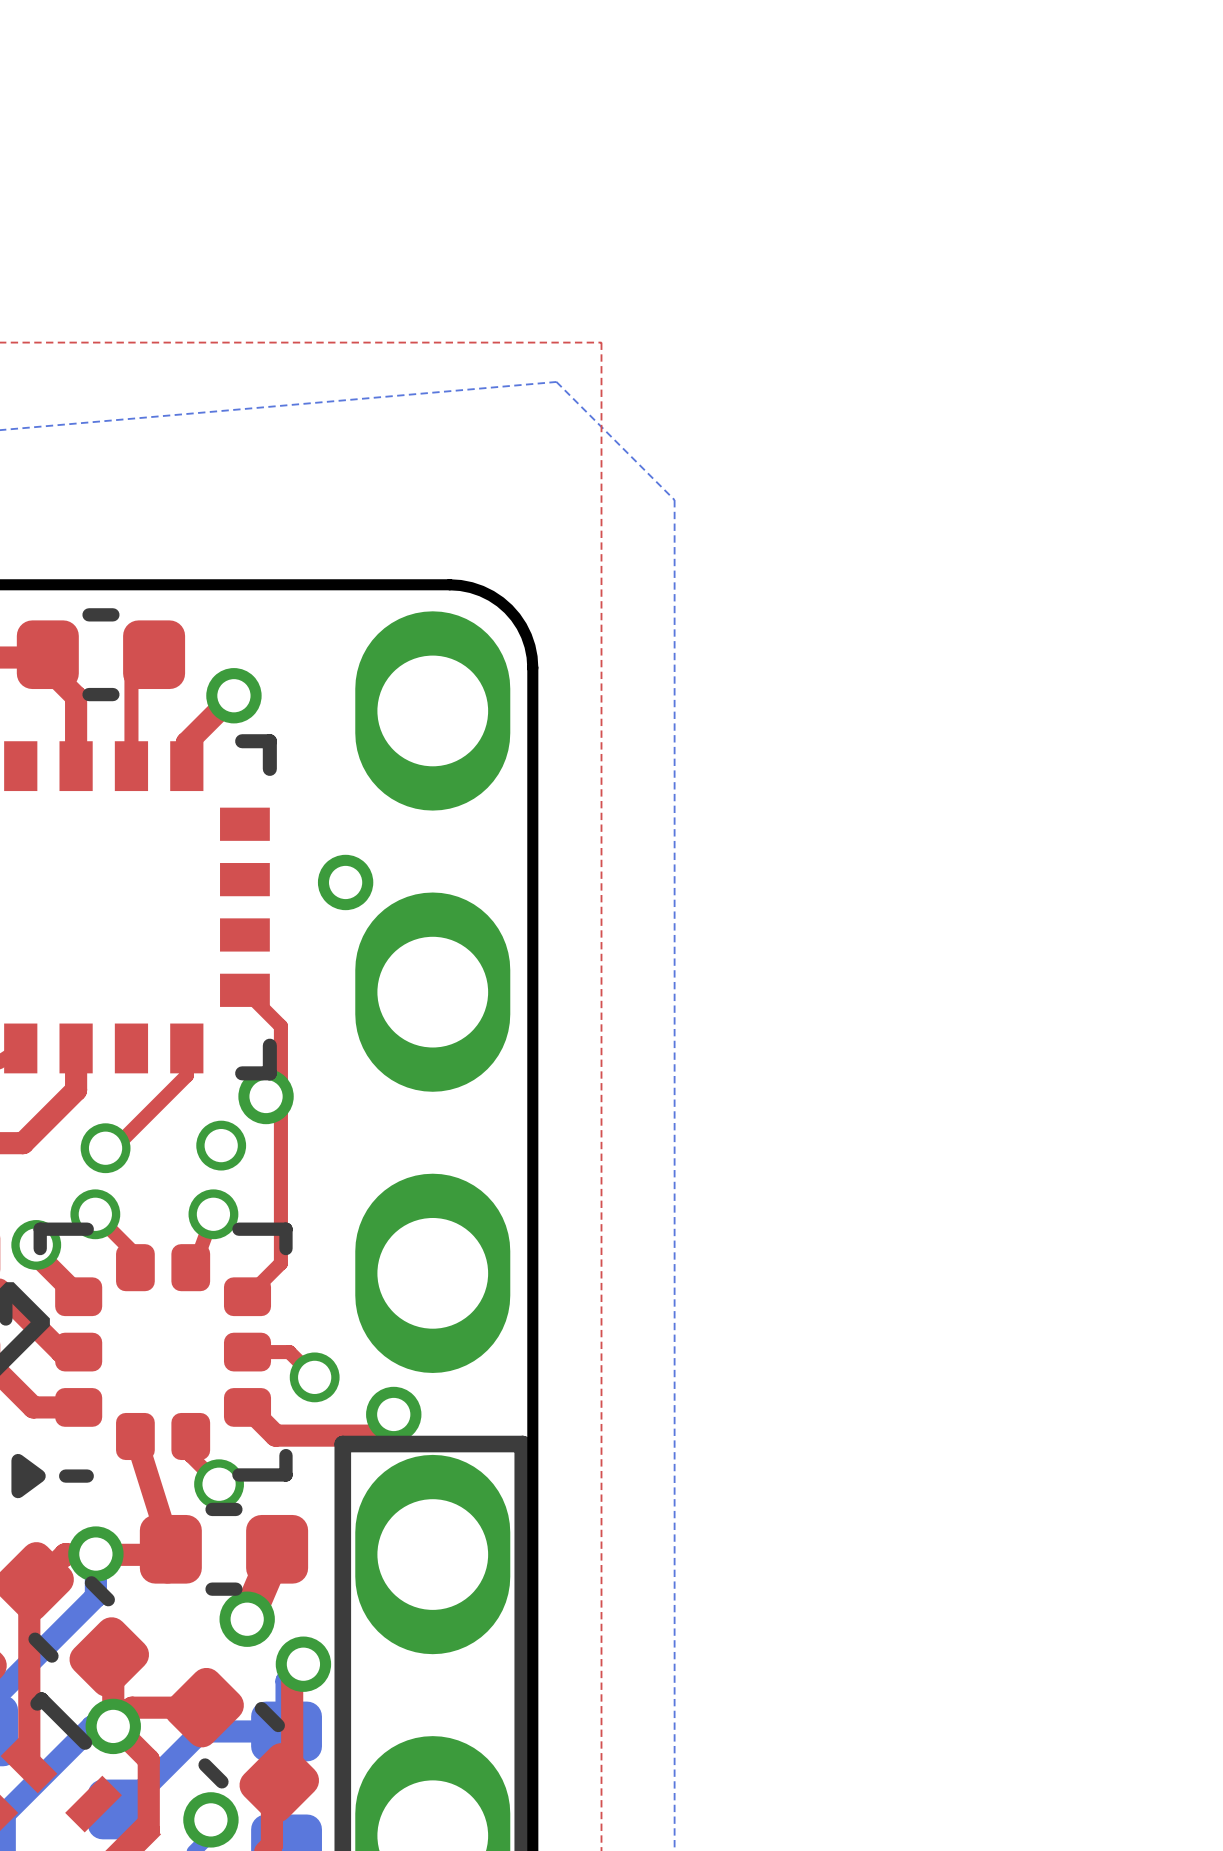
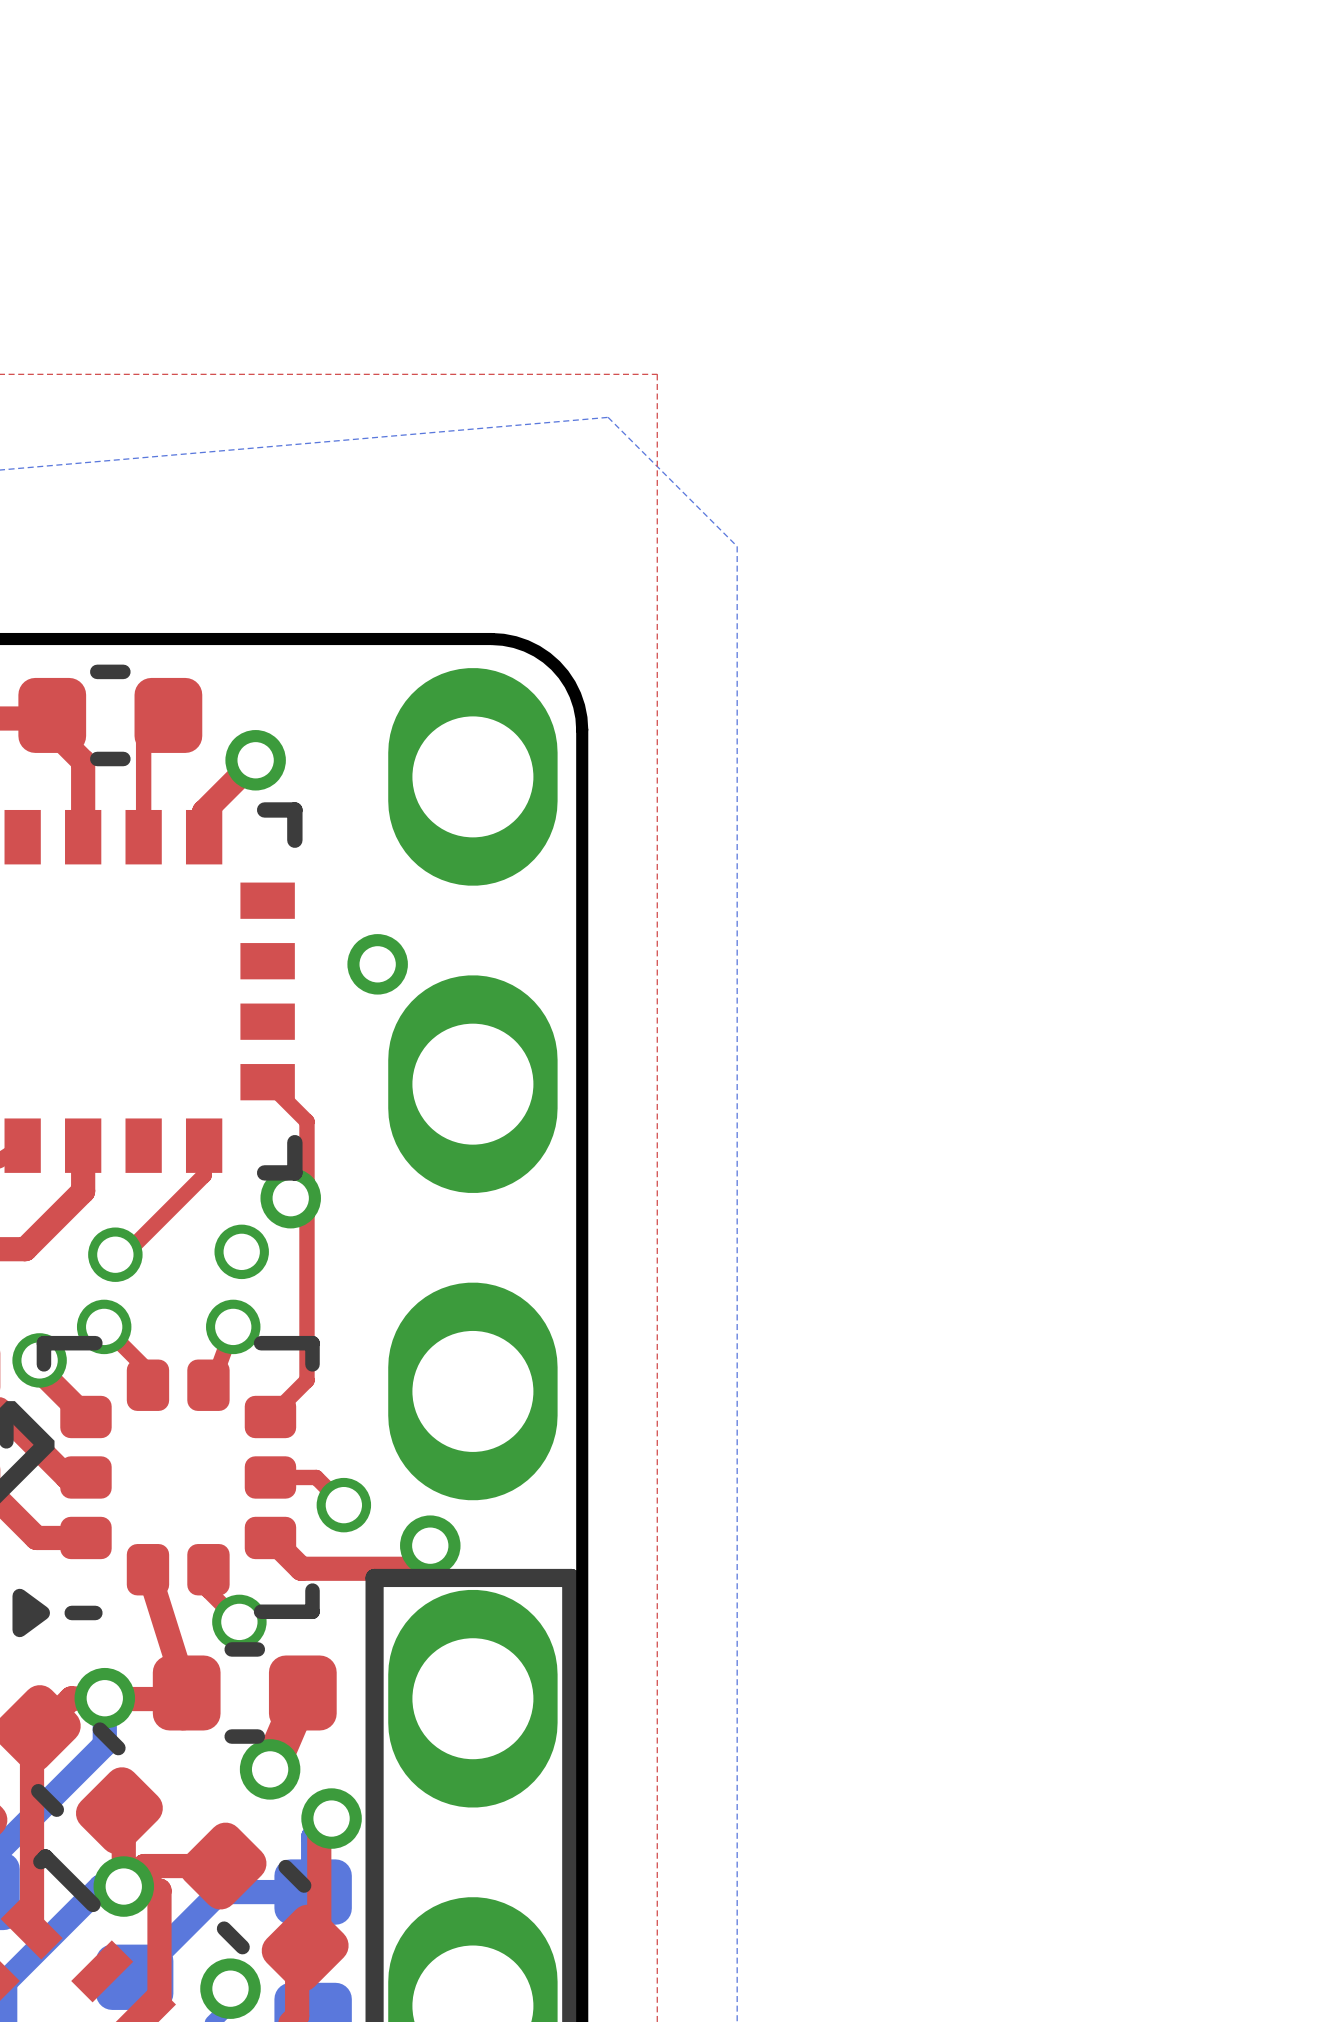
top track: (115, 1726) (148, 1759) (148, 1830) (145, 1832) -> (123, 1886) (159, 1890) (159, 2002)

